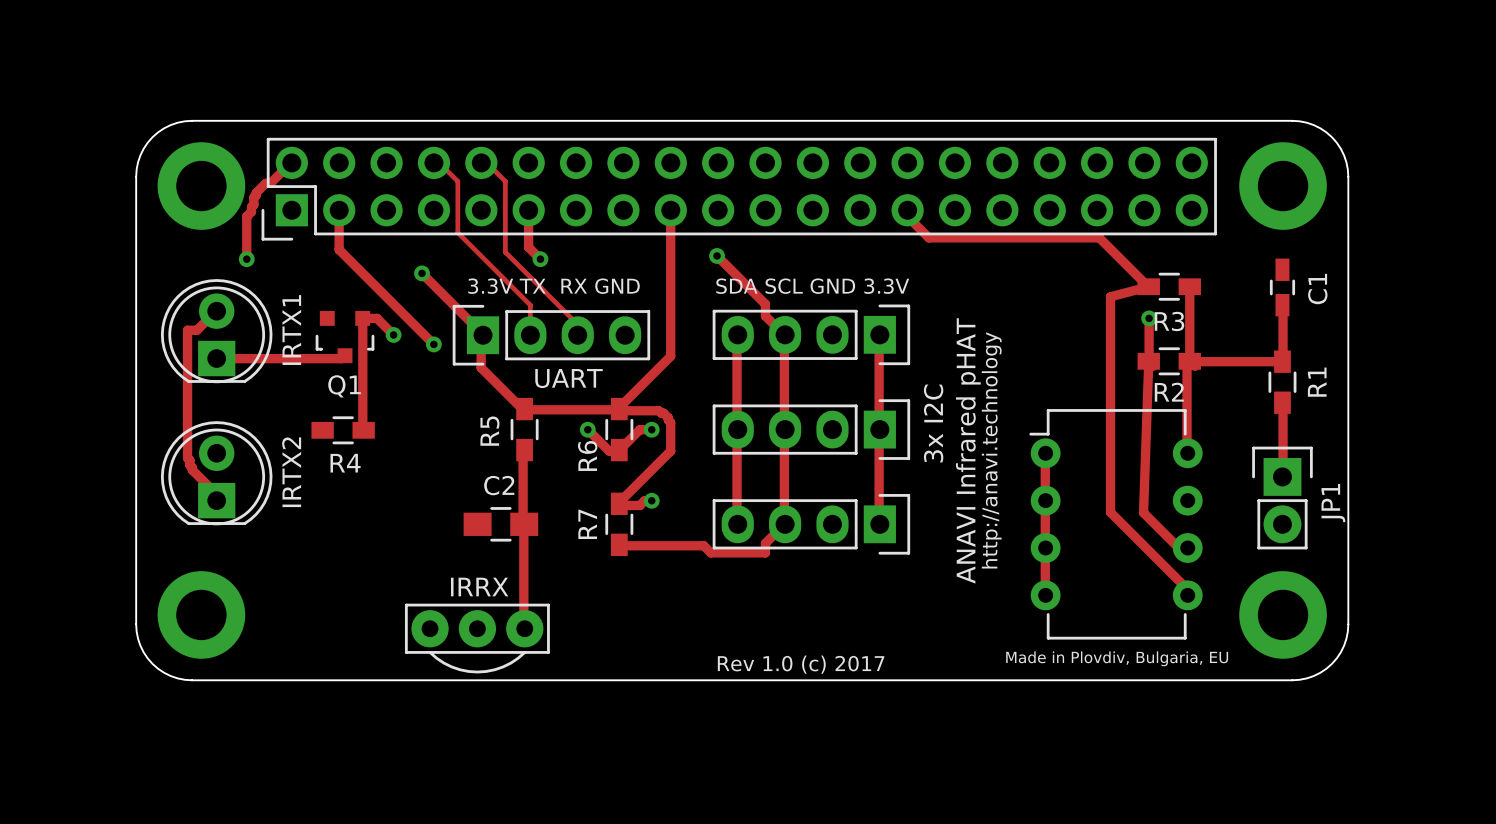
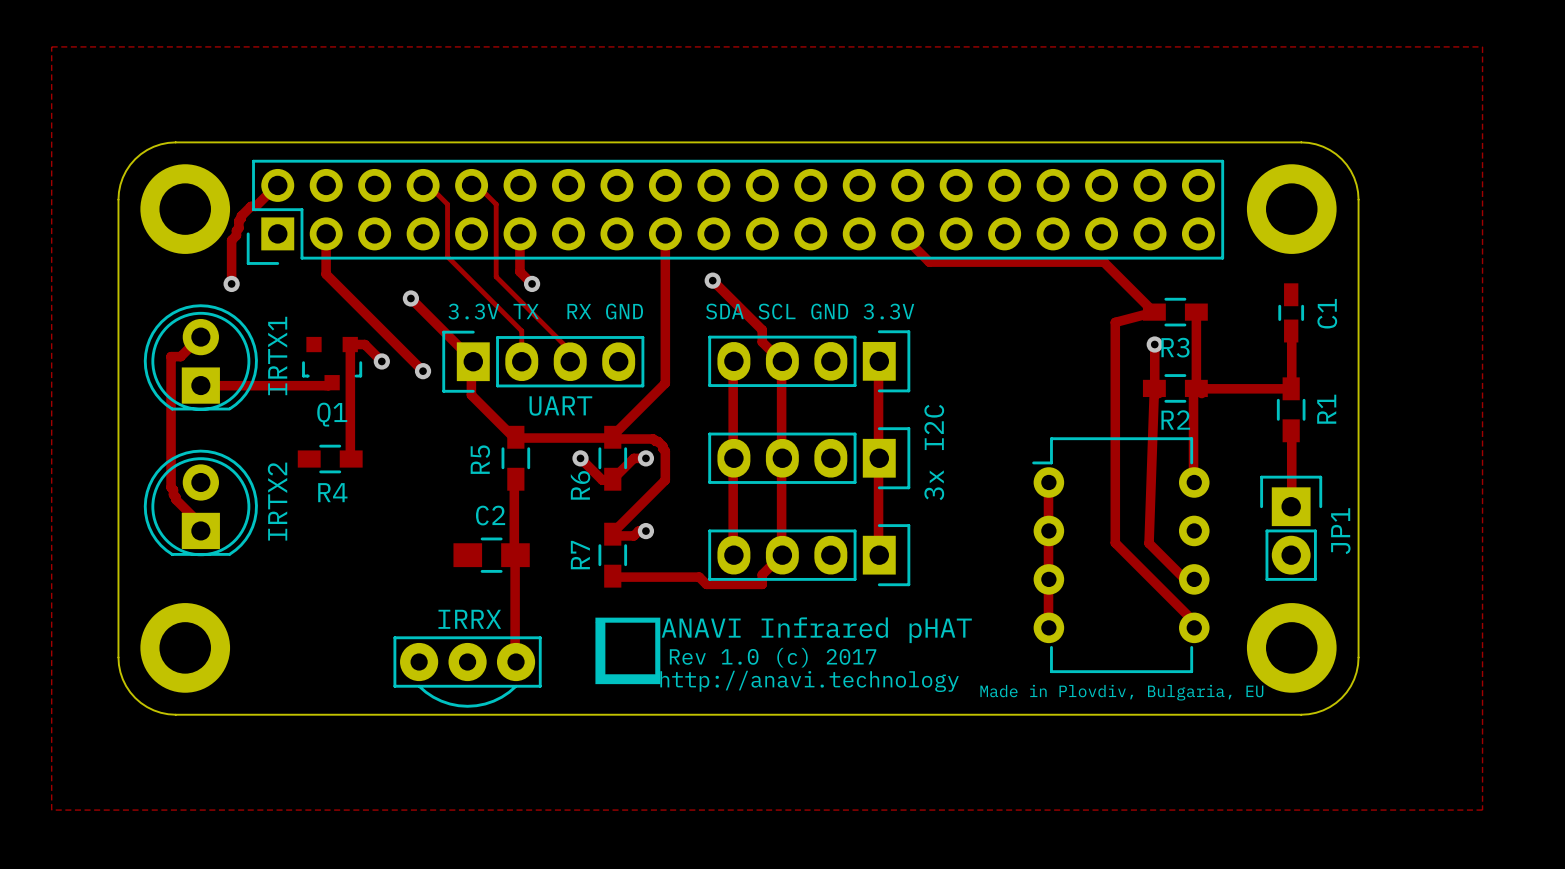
zone outline: none -> (51, 46) (51, 810) (1482, 810) (1482, 46) (51, 46)
text rotation: 0° (968, 450) -> 90° clockwise (816, 630)
text rotation: 0° (991, 450) -> 90° clockwise (809, 681)
drawing: none -> [595, 617, 661, 685]
text position: Rev 1.0 (c) 2017 (801, 664) -> Rev 1.0 (c) 2017 (773, 657)

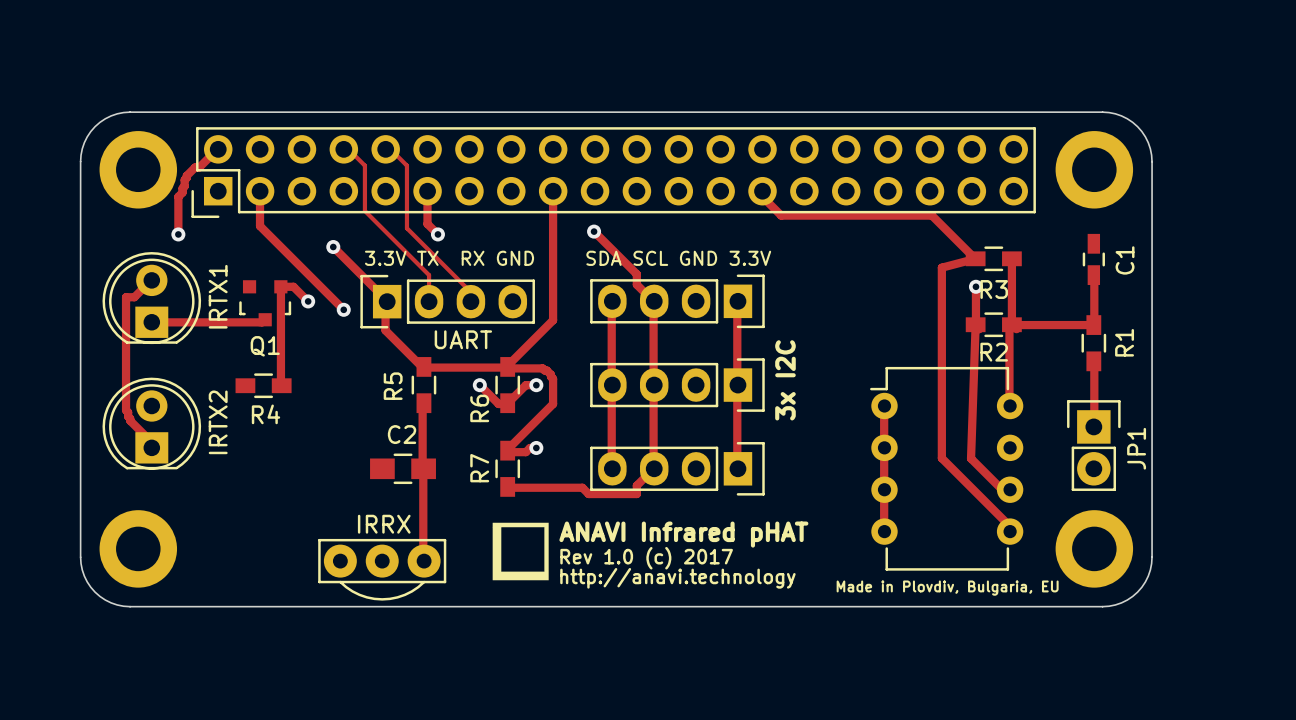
zone outline: (51, 46) (51, 810) (1482, 810) (1482, 46) (51, 46) -> none

